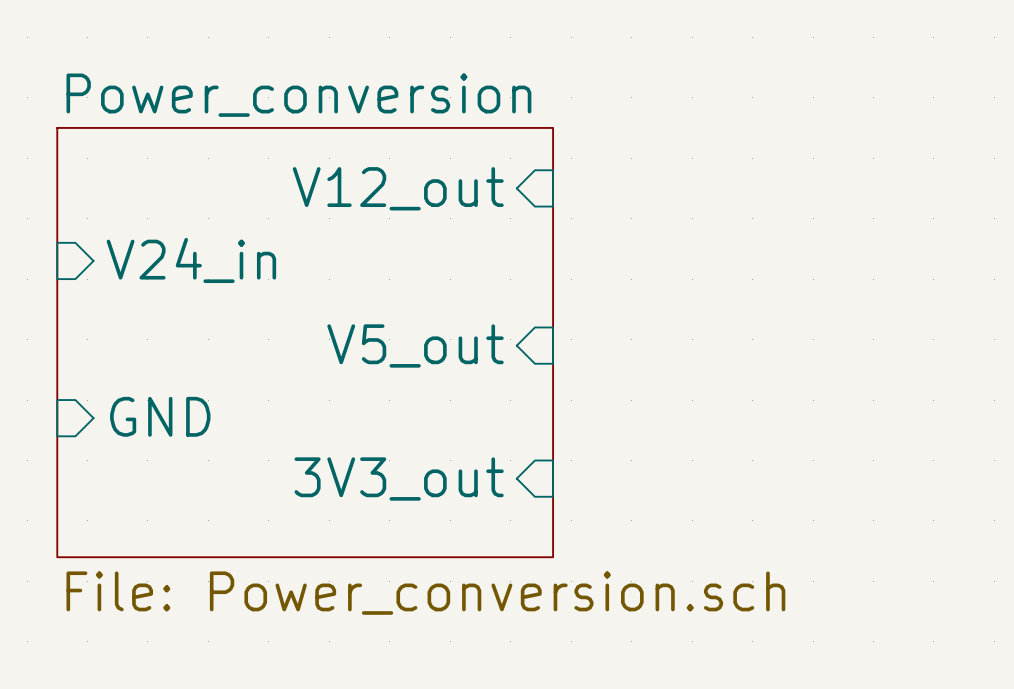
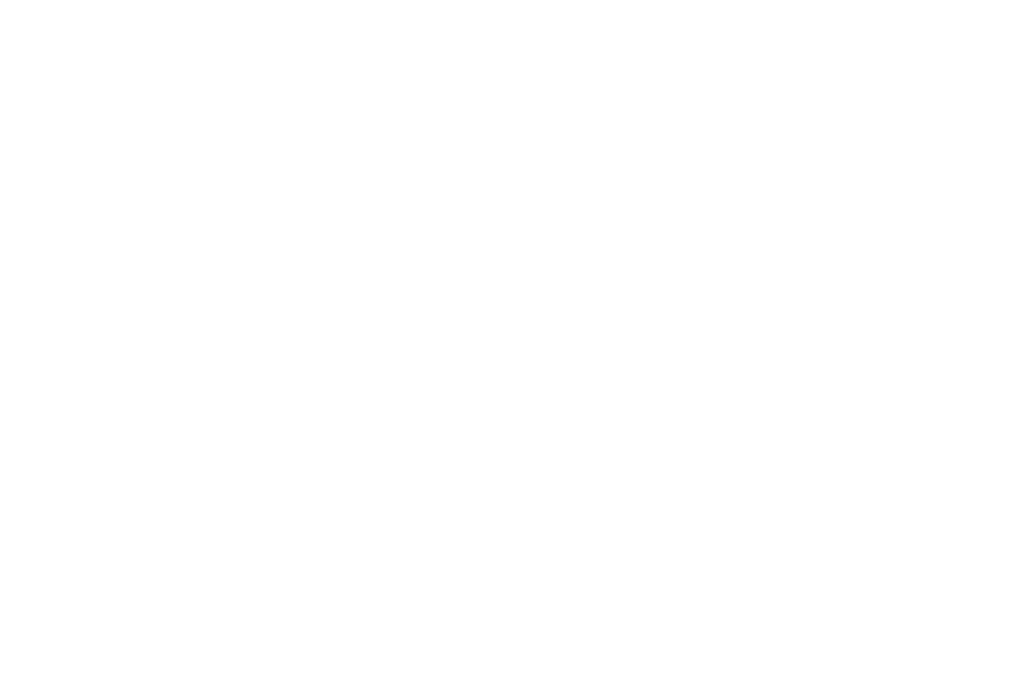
sheet pin: V12_out (398, 188) -> none
sheet pin: V24_in (191, 260) -> none
sheet Power_conversion: File: Power_conversion.sch (305, 342) -> none
sheet pin: V5_out (415, 345) -> none
sheet pin: GND (160, 416) -> none
sheet pin: 3V3_out (399, 479) -> none

